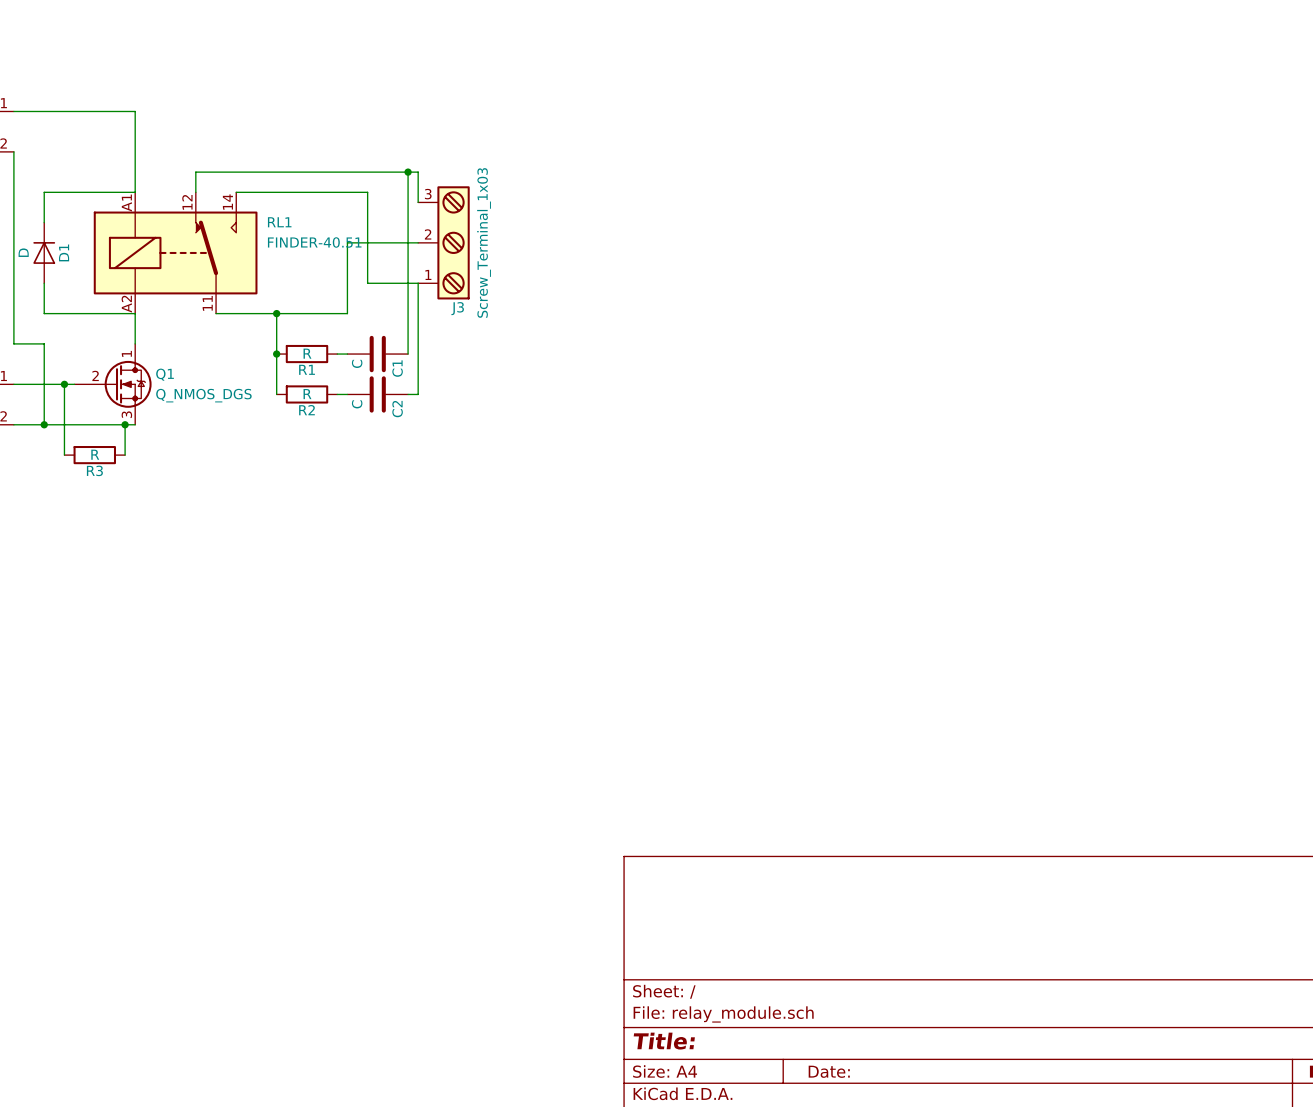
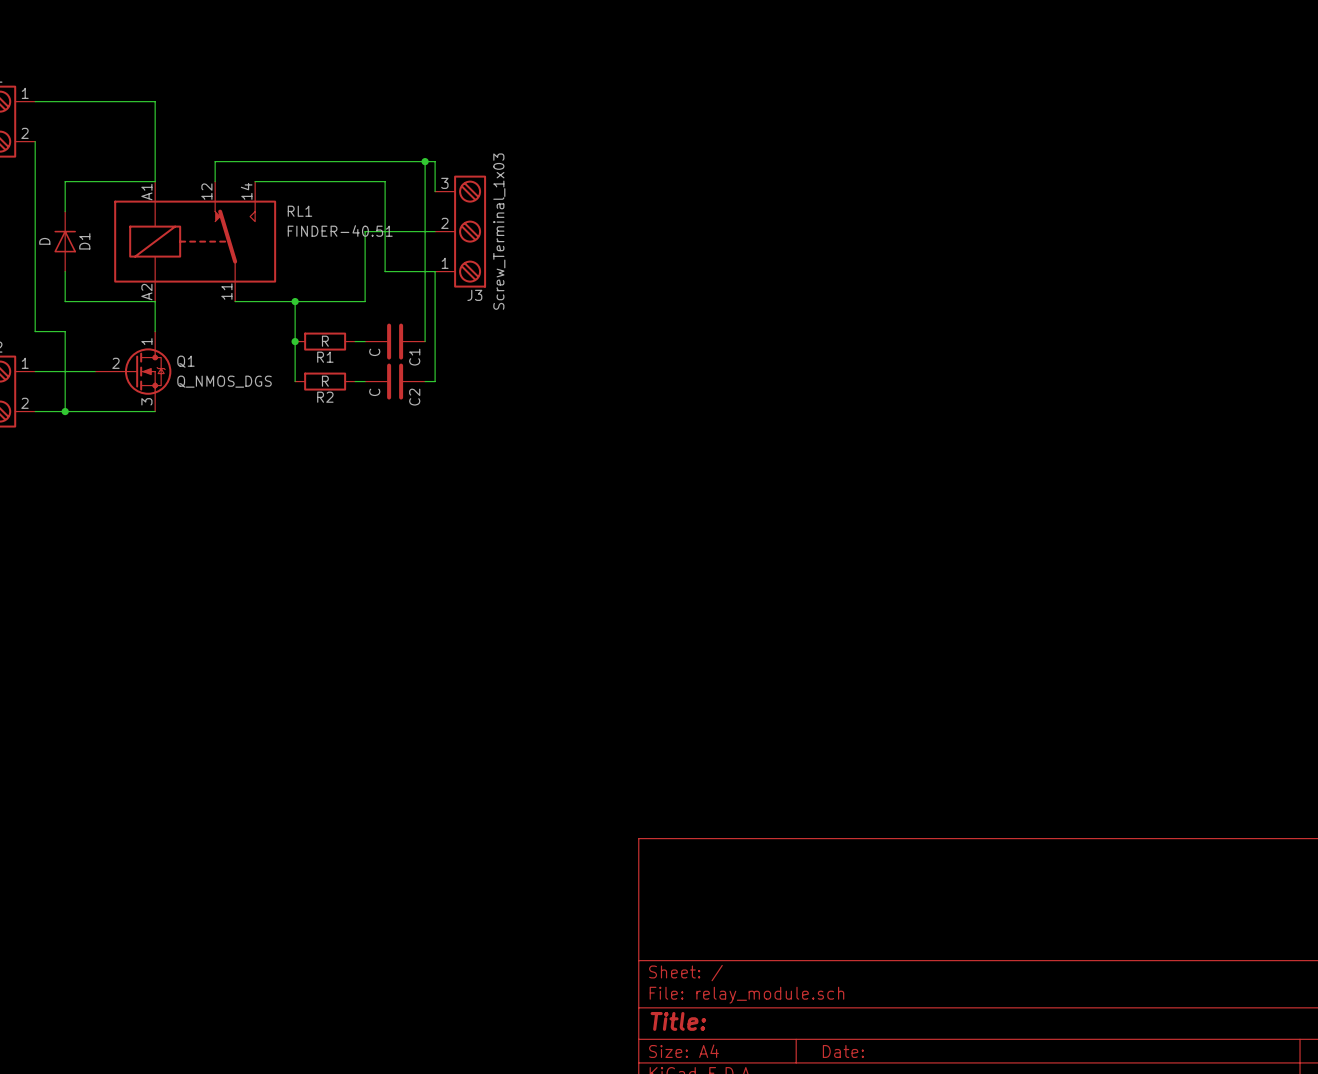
wire: (64, 384) (64, 455) -> none
junction: (64, 384) -> none
wire: (125, 424) (125, 455) -> none
junction: (125, 424) -> none
R3: R (94, 455) -> none

